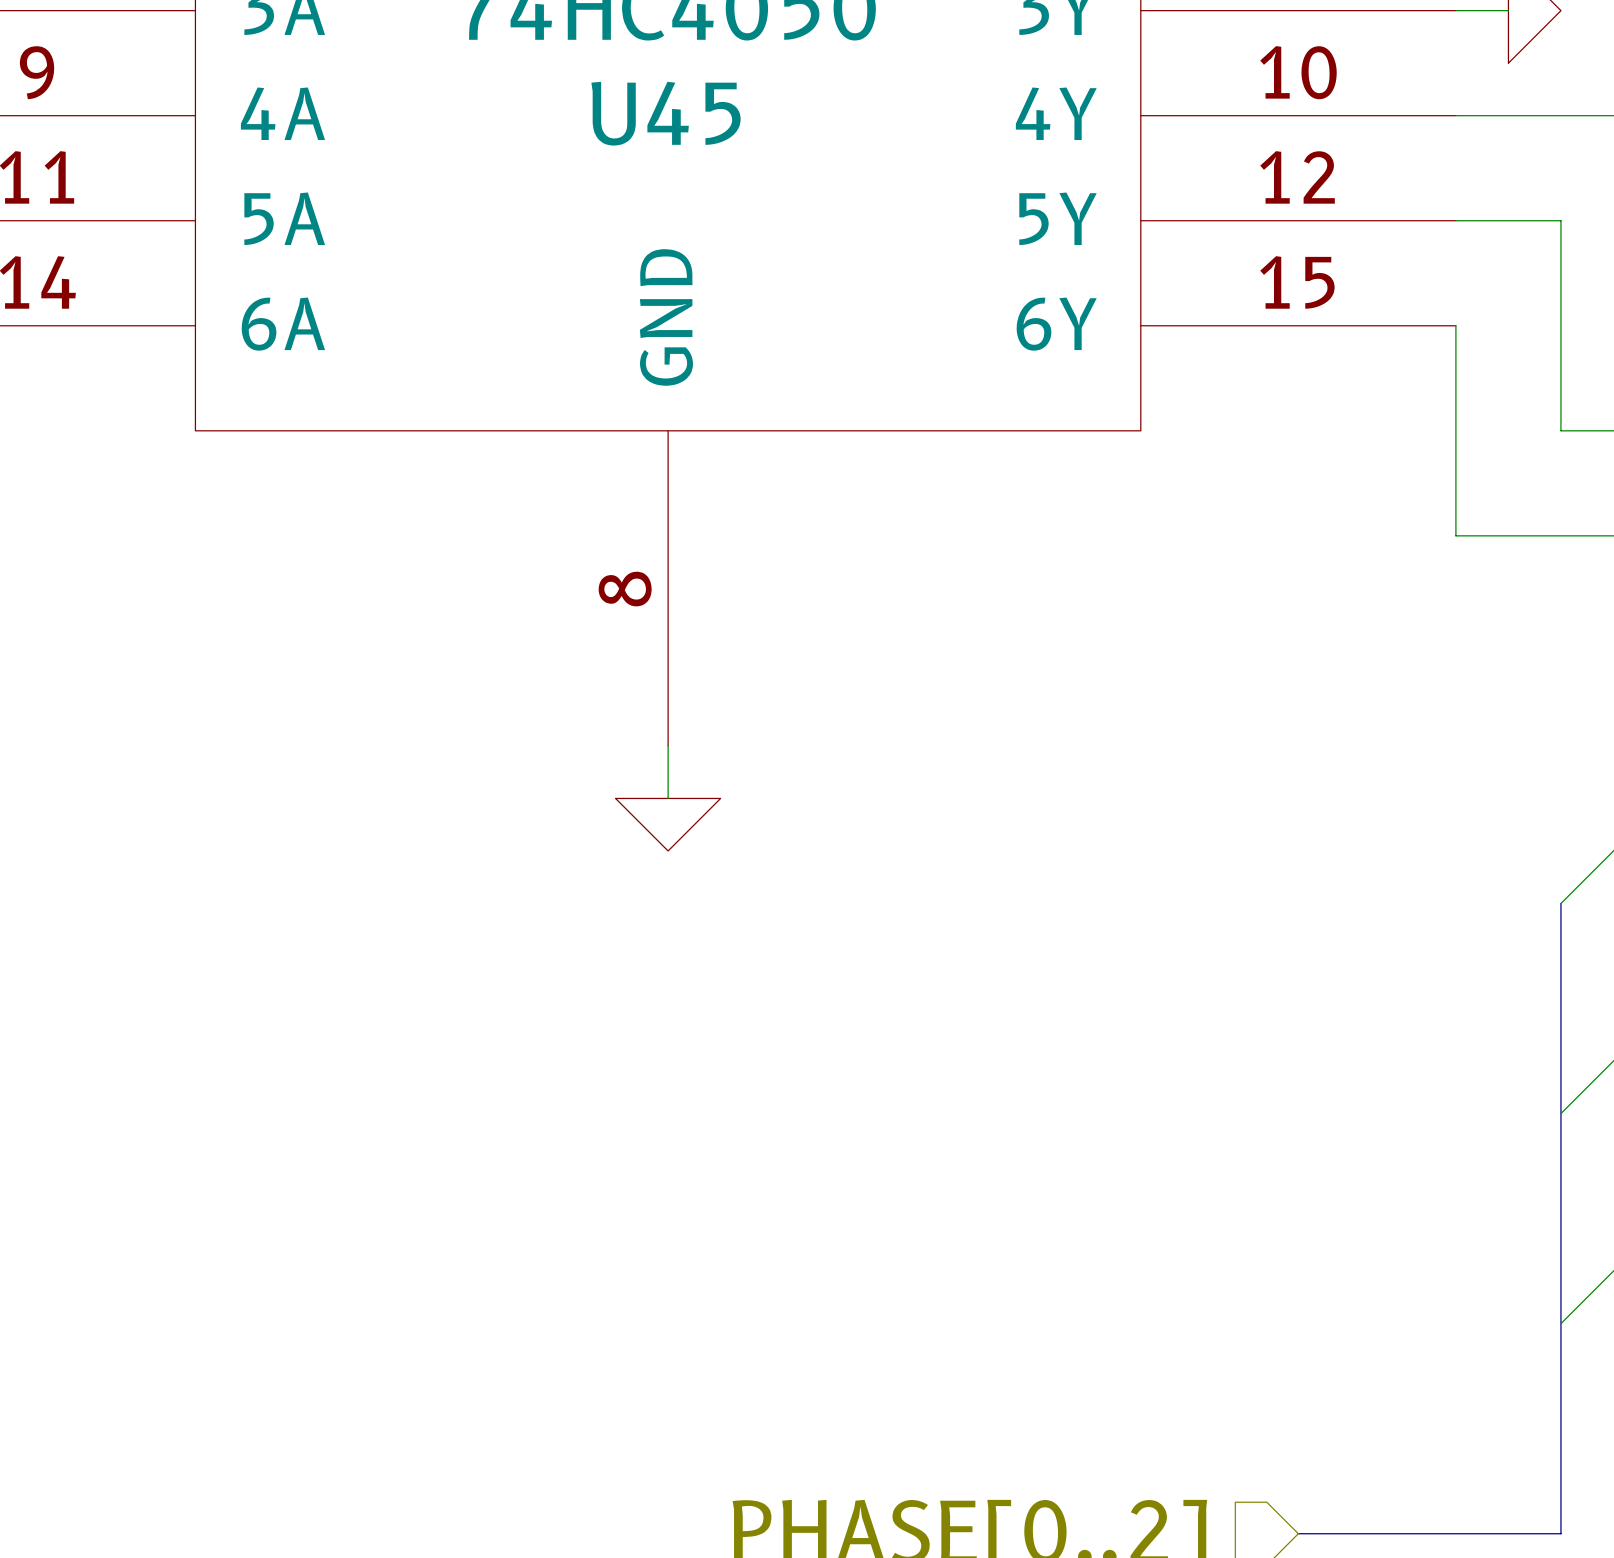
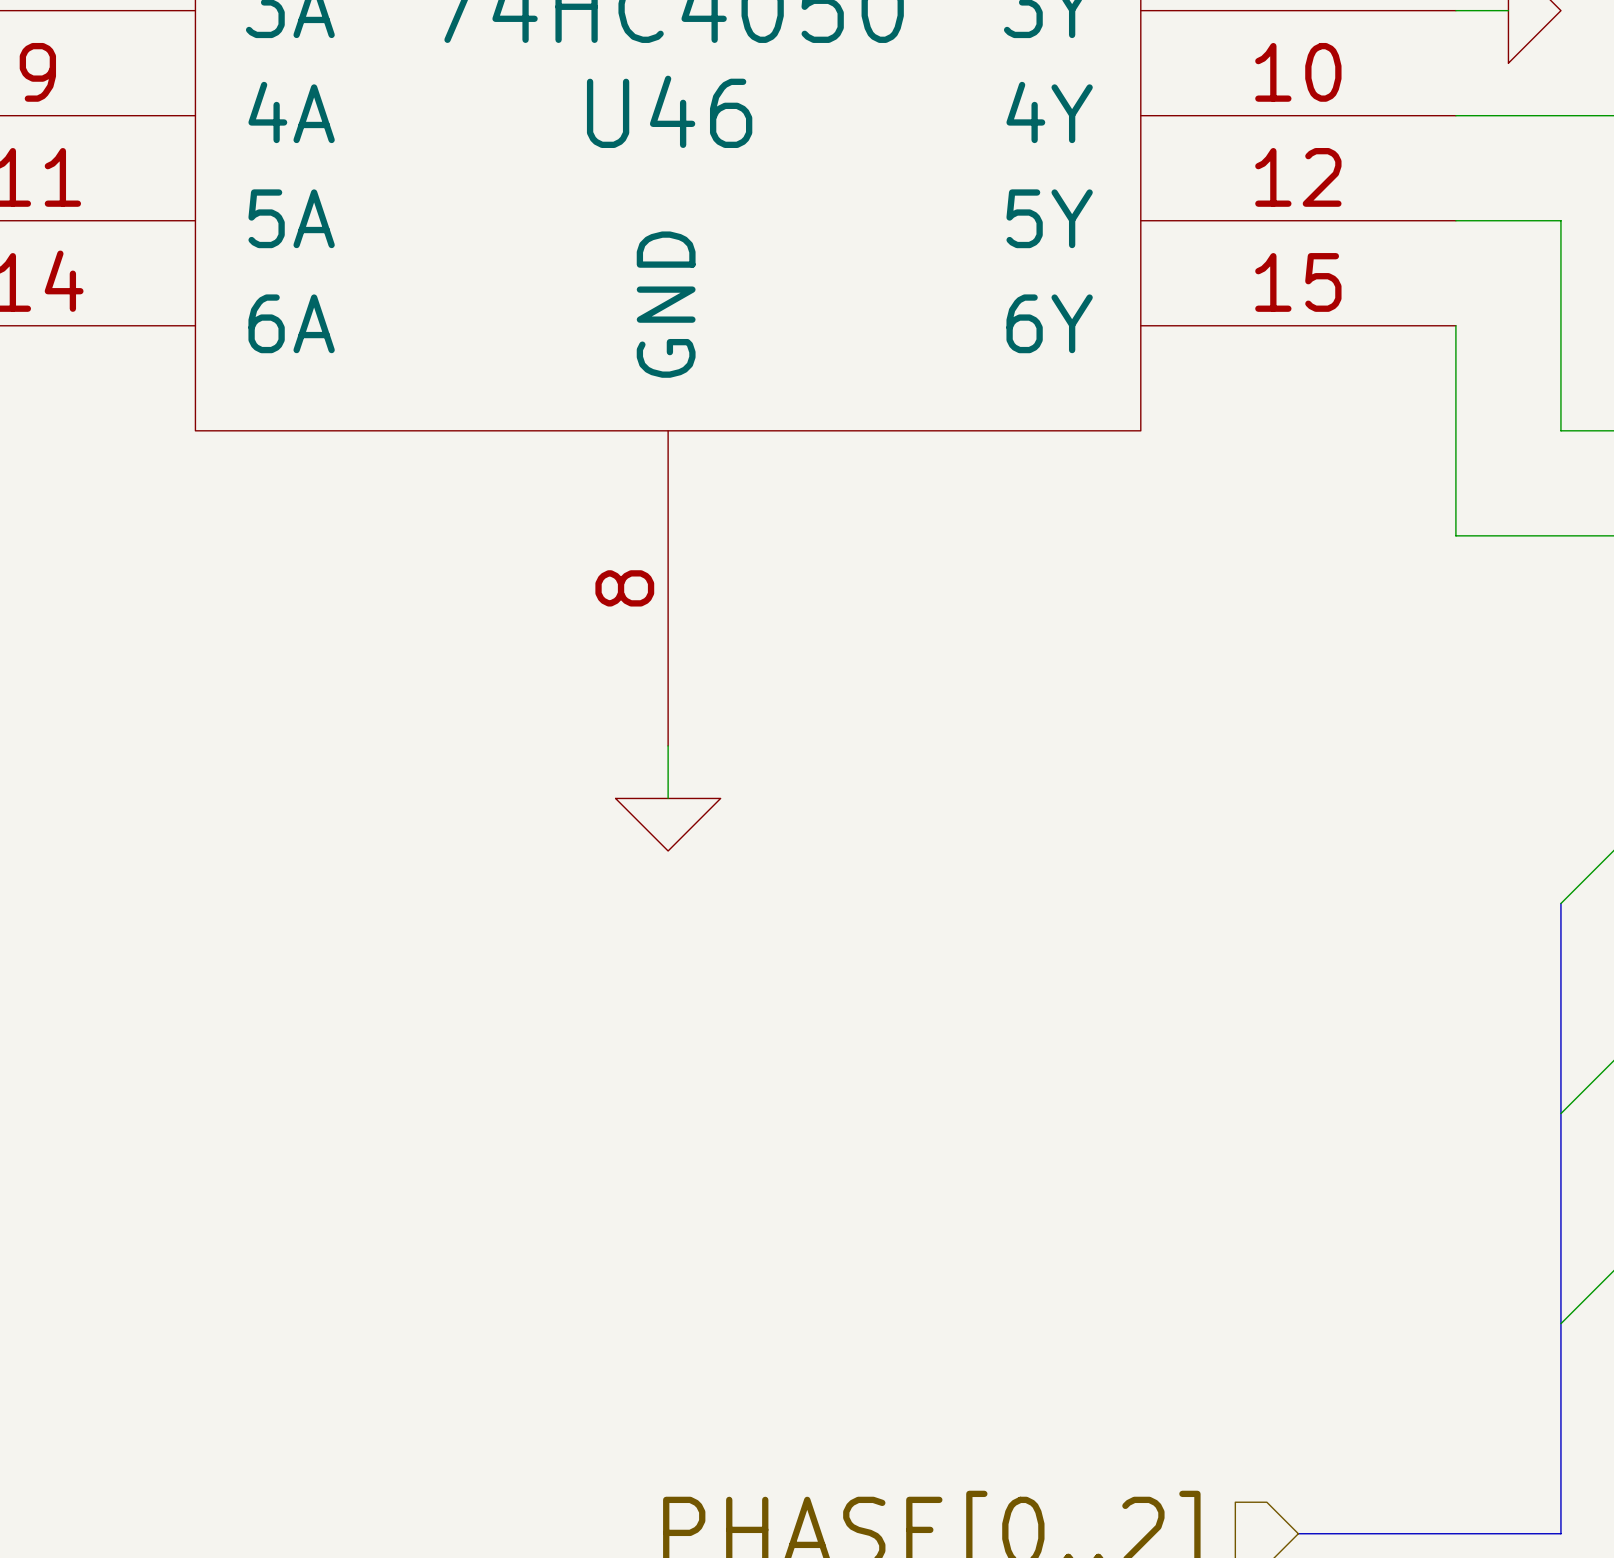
U45 name: U45 (666, 113) -> U46 (669, 111)

